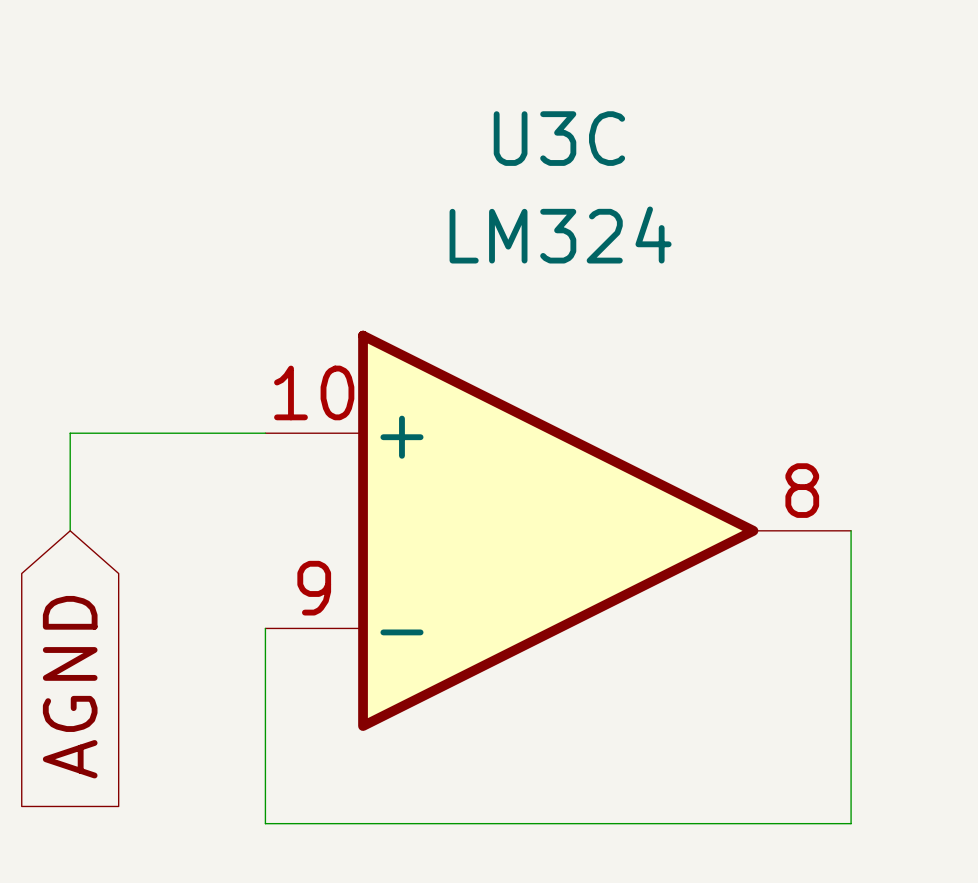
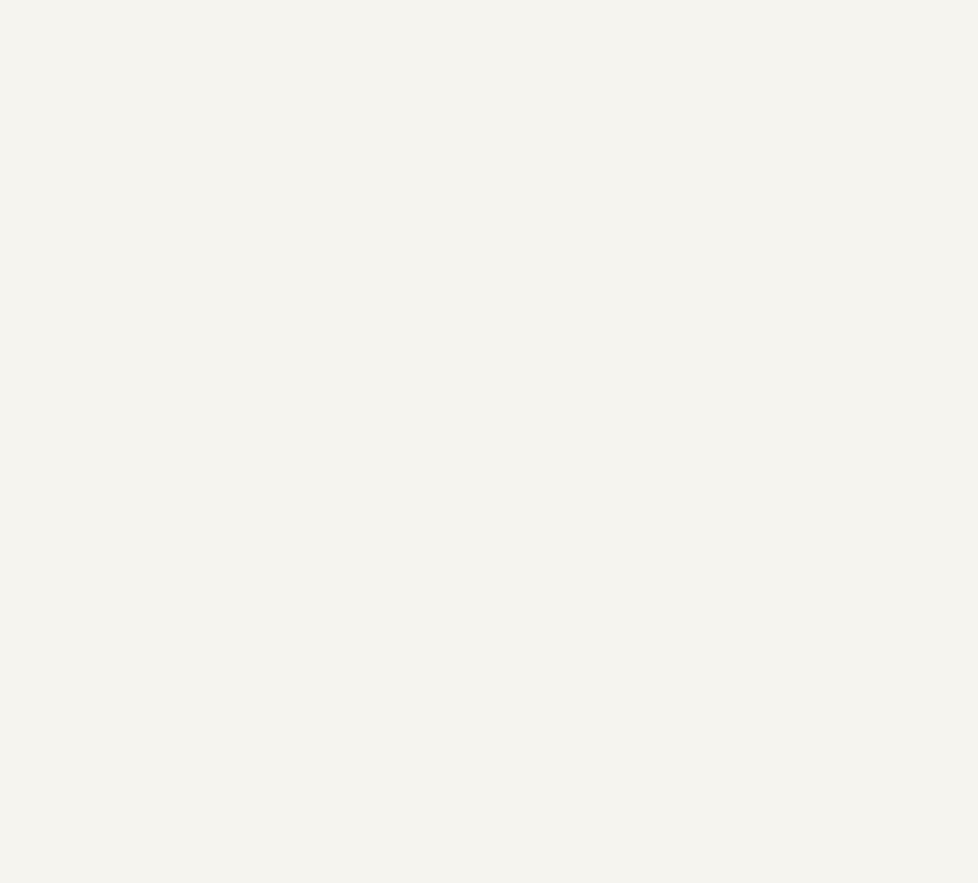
wire: (265, 433) (70, 433) (70, 530) -> none
U3C: LM324 (558, 530) -> none
wire: (851, 530) (851, 823) (265, 823) (265, 628) -> none
global label: AGND (70, 687) -> none

